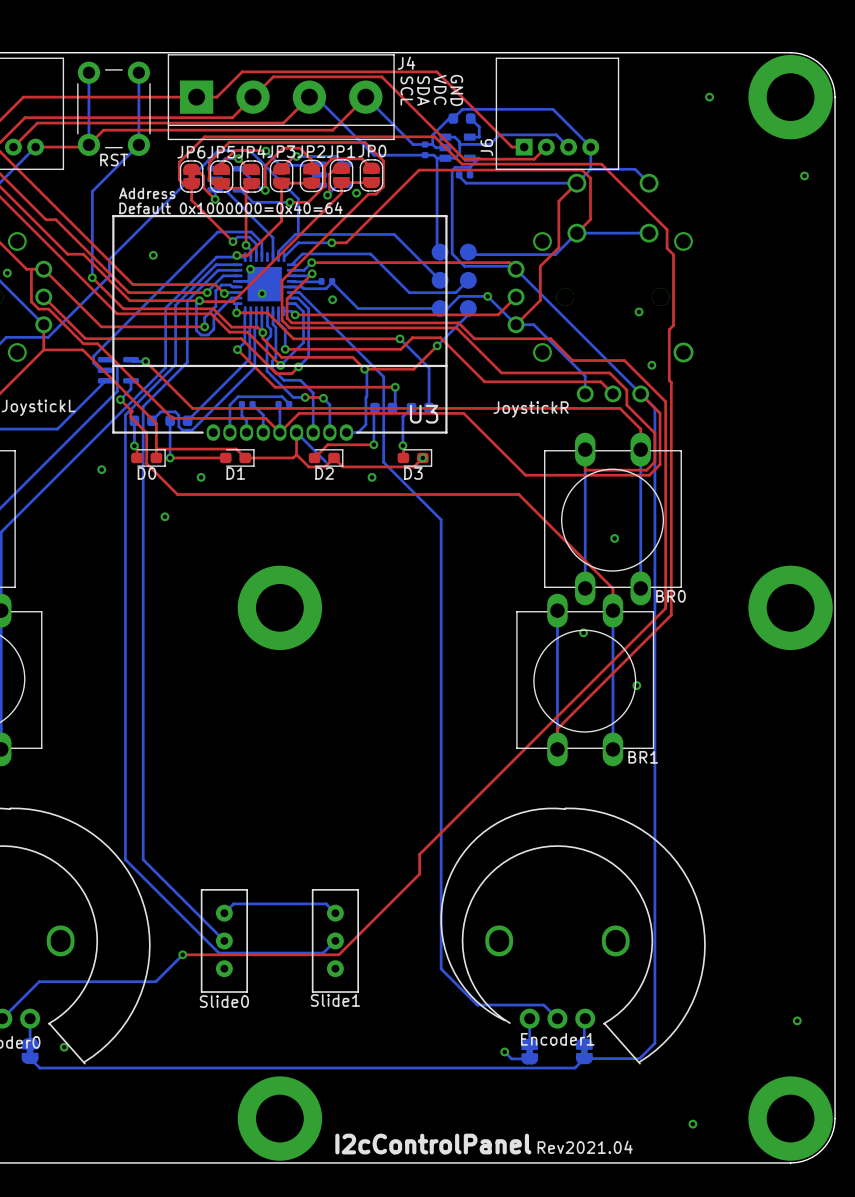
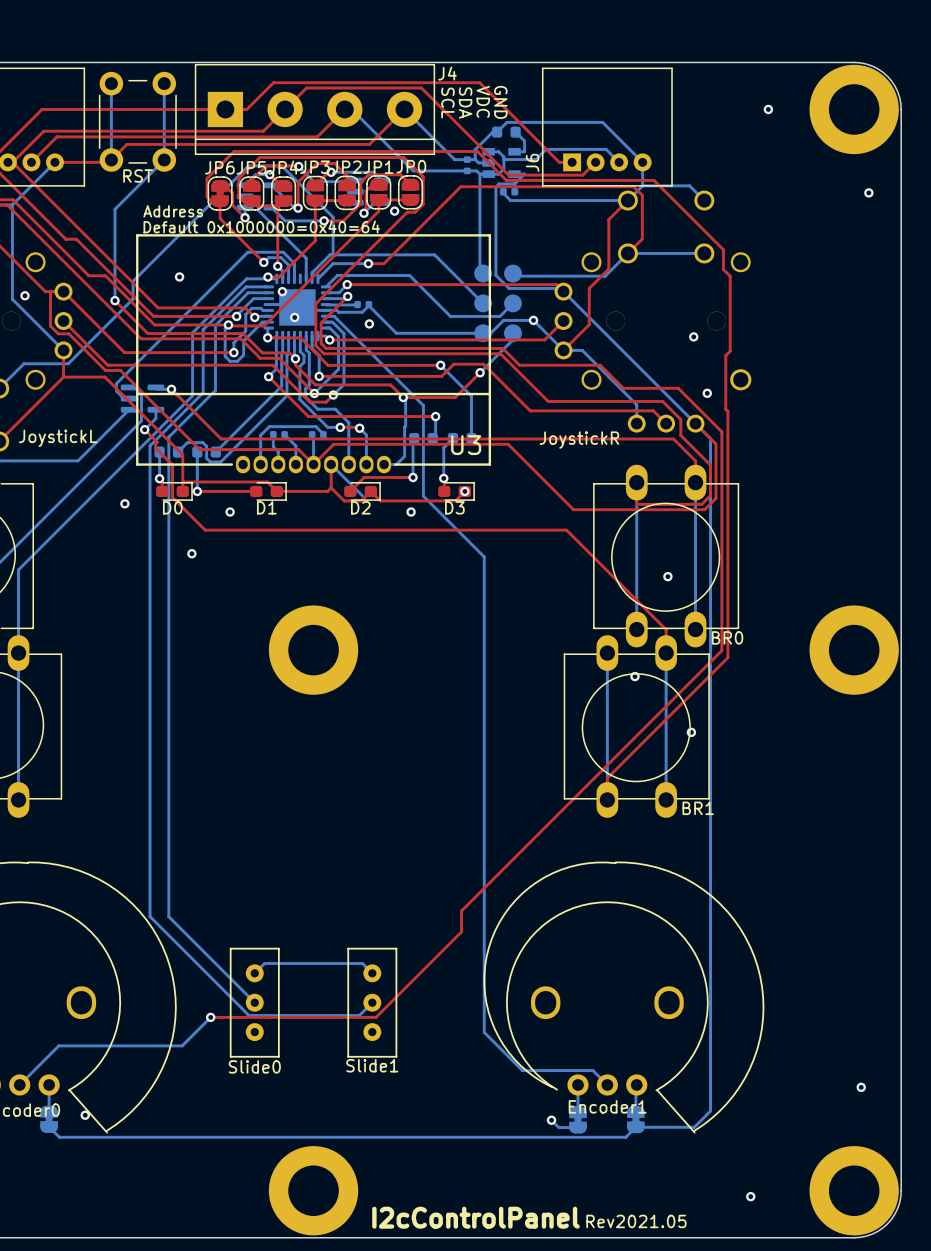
text: Rev2021.04 (585, 1147) -> Rev2021.05 (636, 1221)

